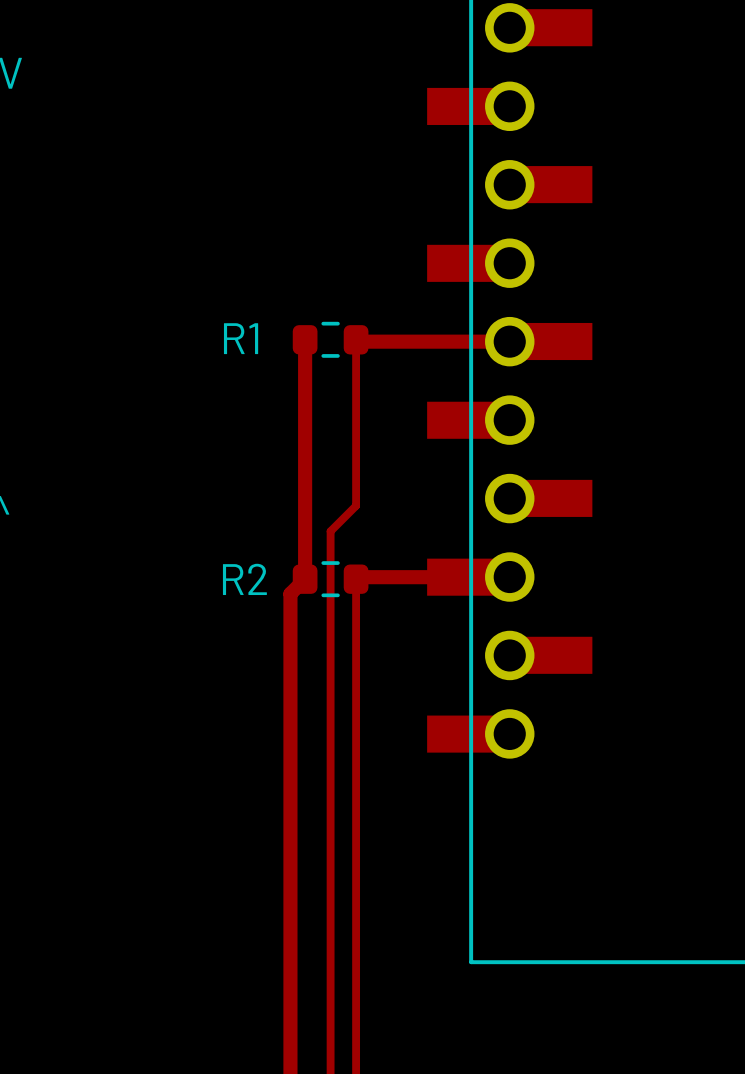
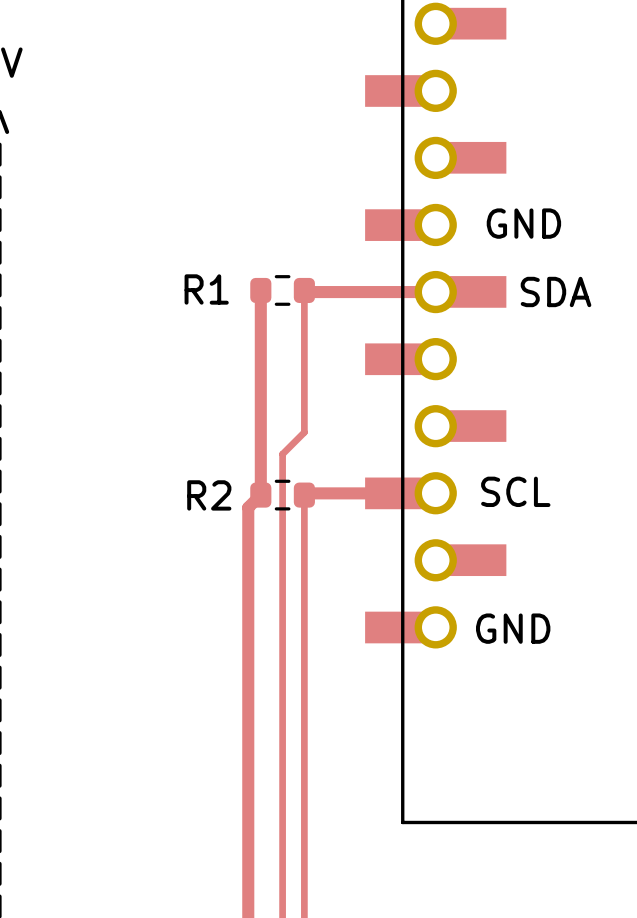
text: none -> GND (523, 223)
text: none -> SDA (556, 291)
text: none -> SCL (515, 491)
text: none -> GND (513, 628)

